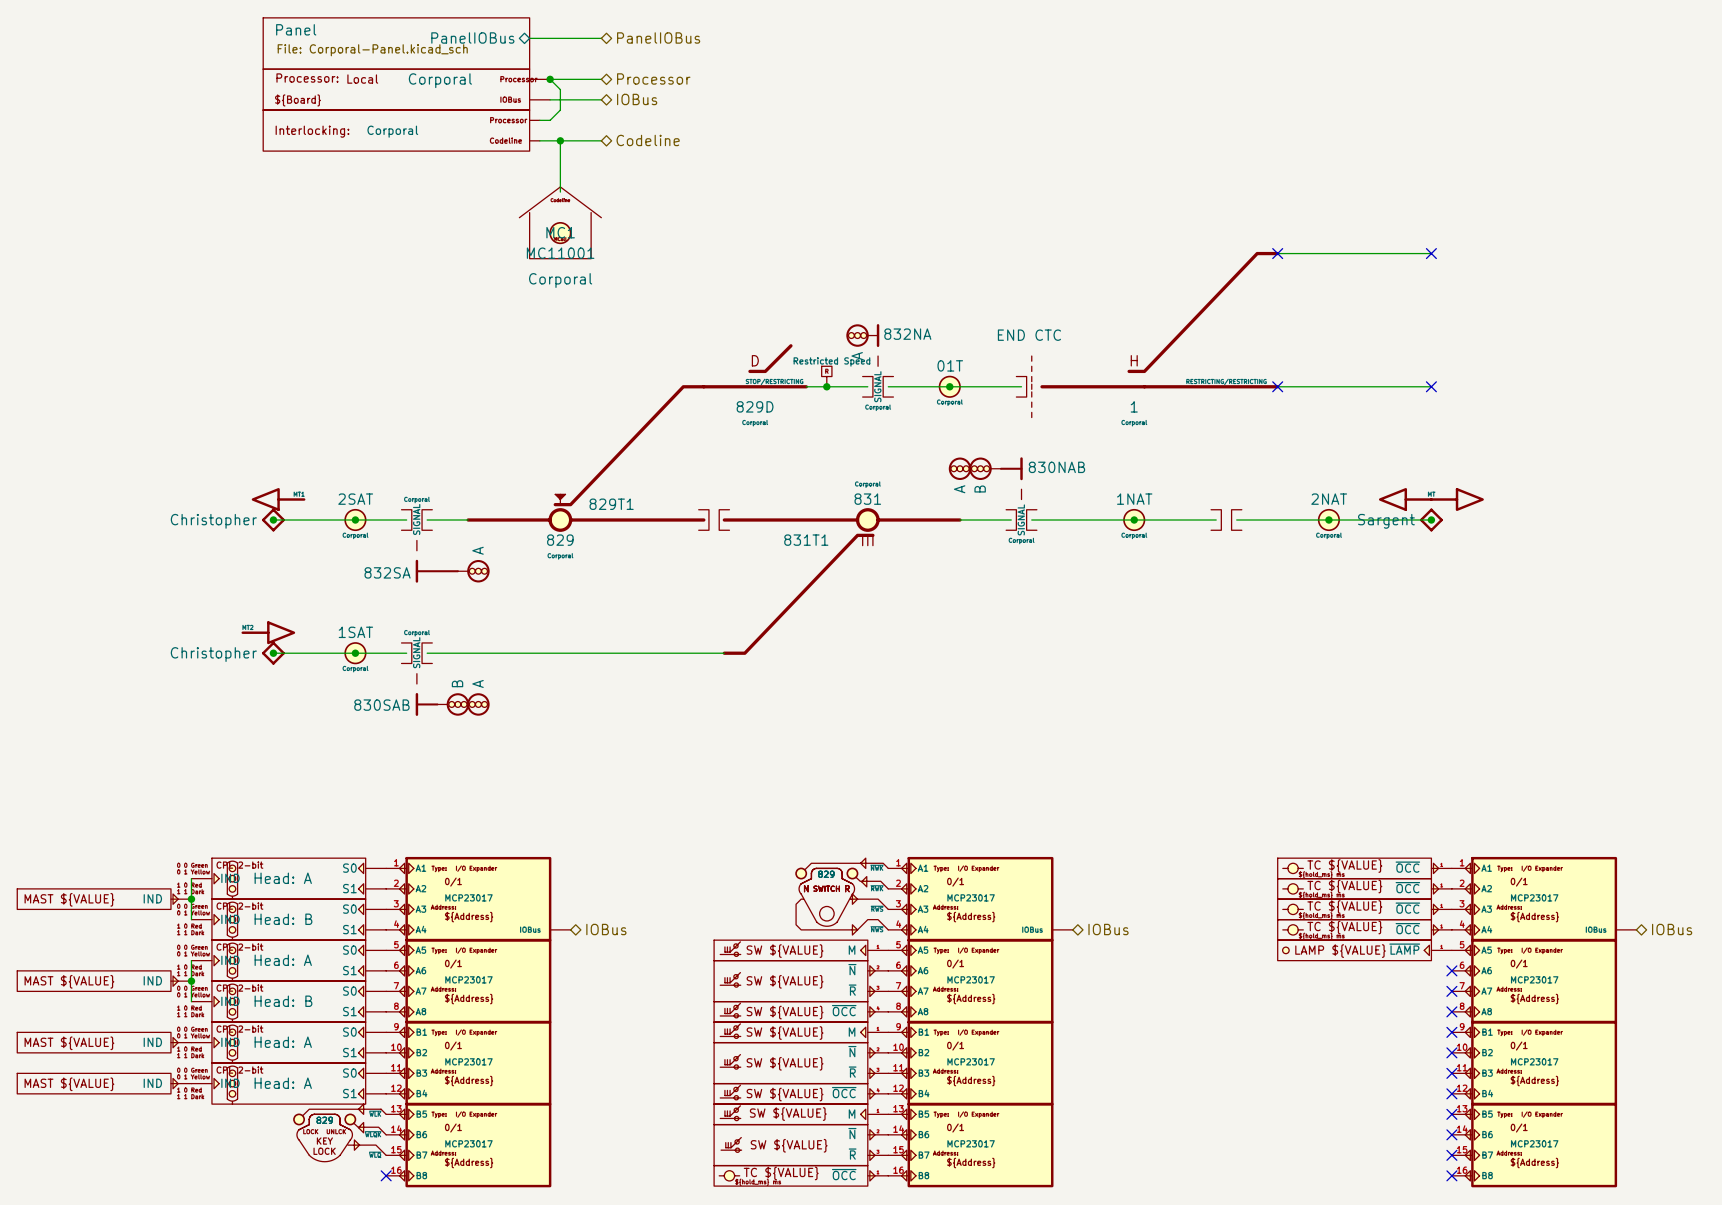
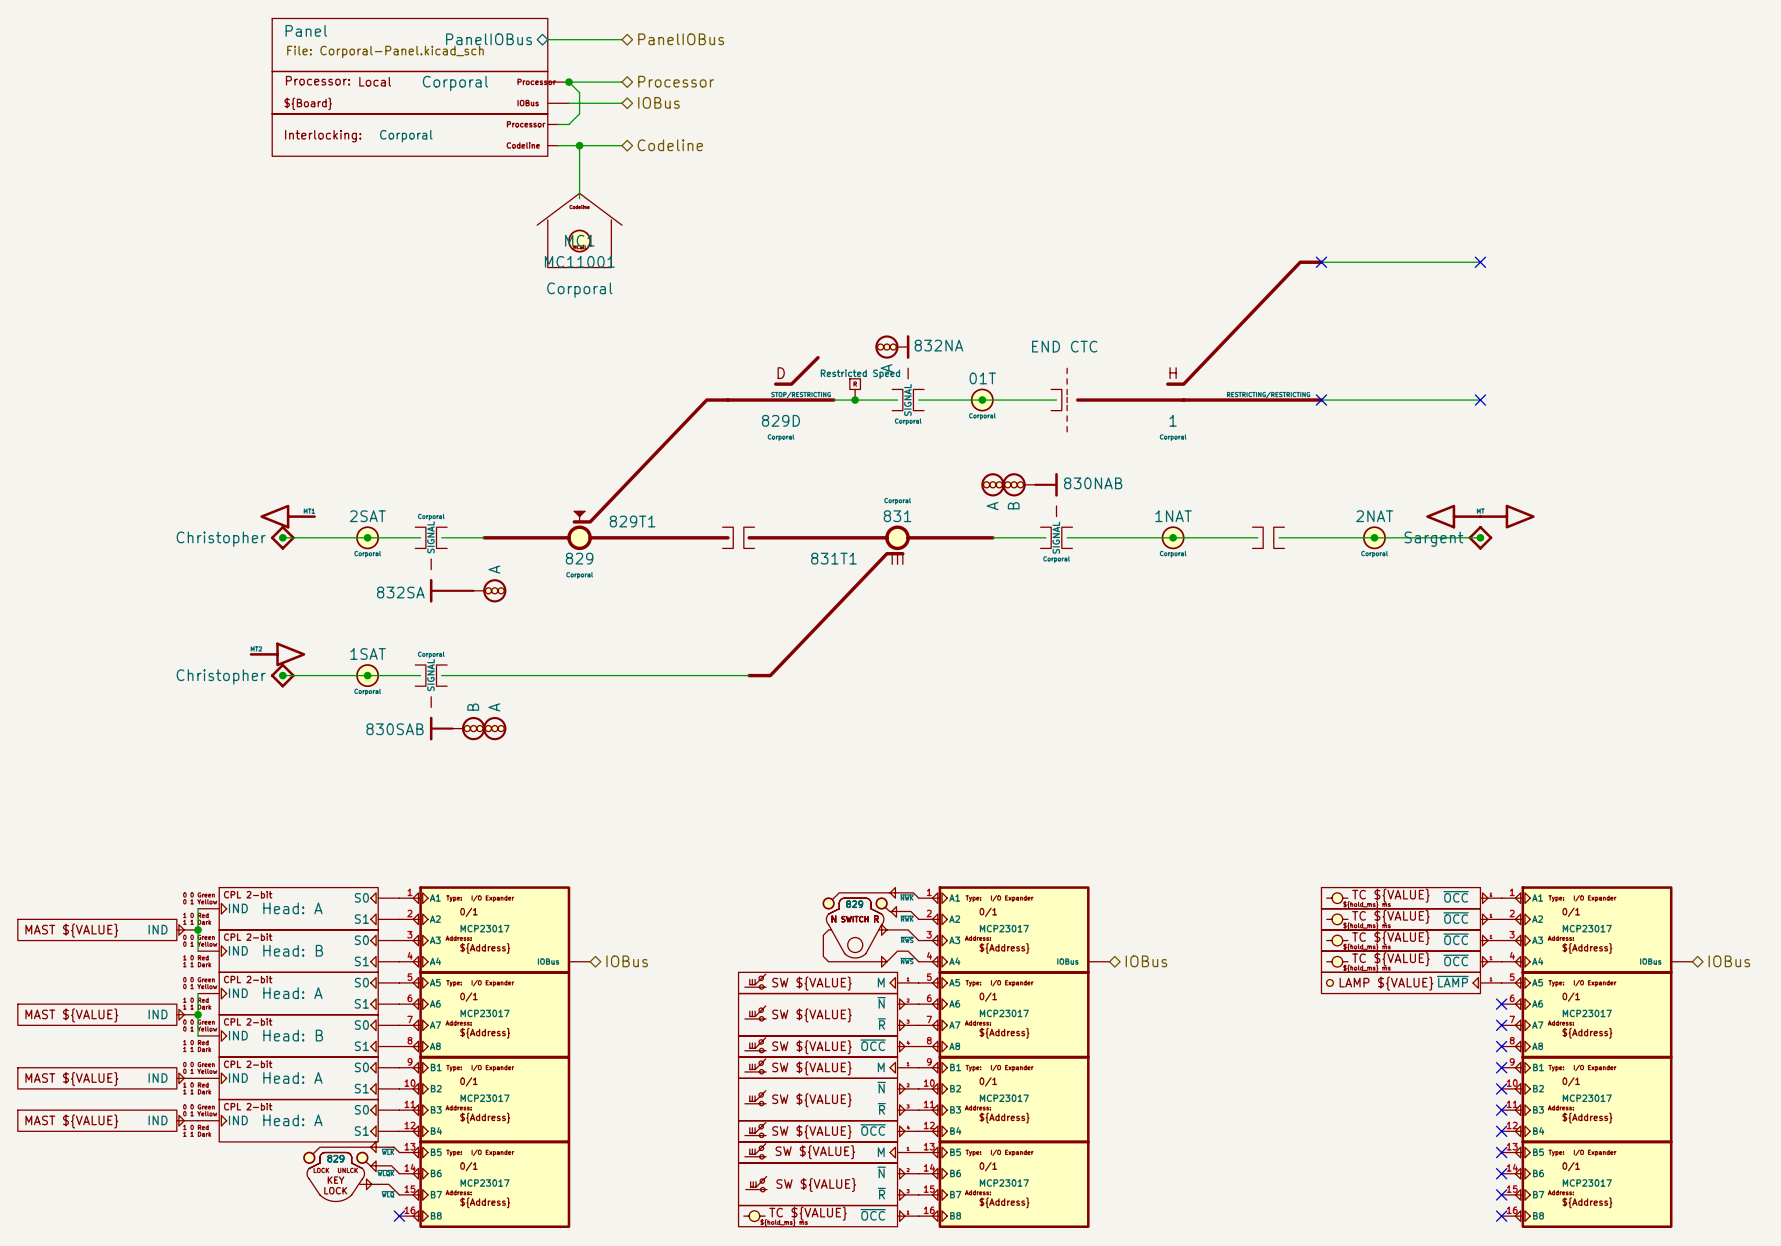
part symbol: [191, 858, 387, 900] -> [198, 887, 400, 930]
part symbol: [191, 899, 387, 941] -> [198, 929, 400, 973]
part symbol: [191, 940, 387, 982] -> [198, 972, 400, 1015]
part symbol: [191, 981, 387, 1023] -> [198, 1014, 400, 1058]
part symbol: [191, 1022, 387, 1064] -> [198, 1057, 400, 1100]
part symbol: [191, 1063, 387, 1105] -> [198, 1099, 400, 1142]

